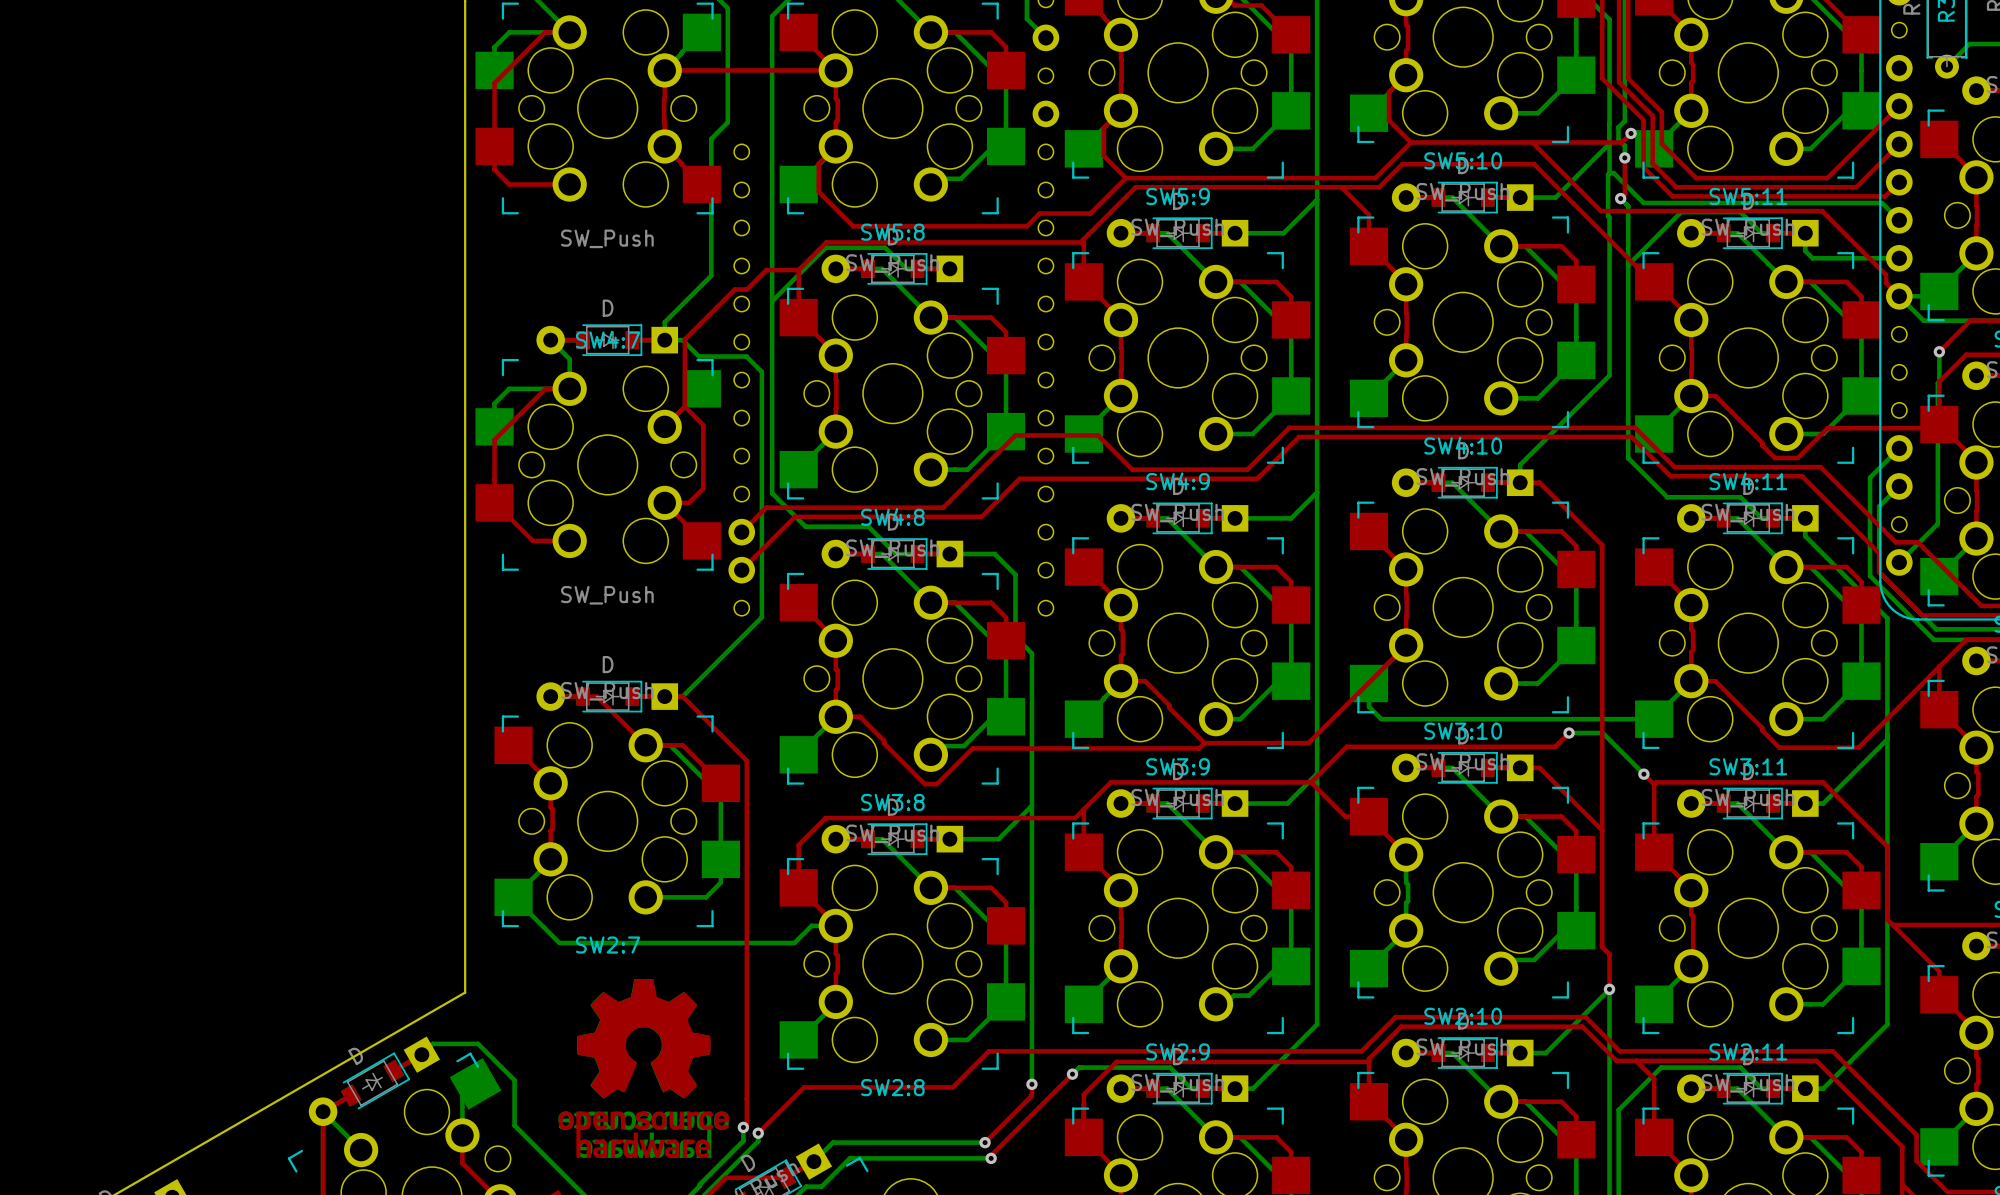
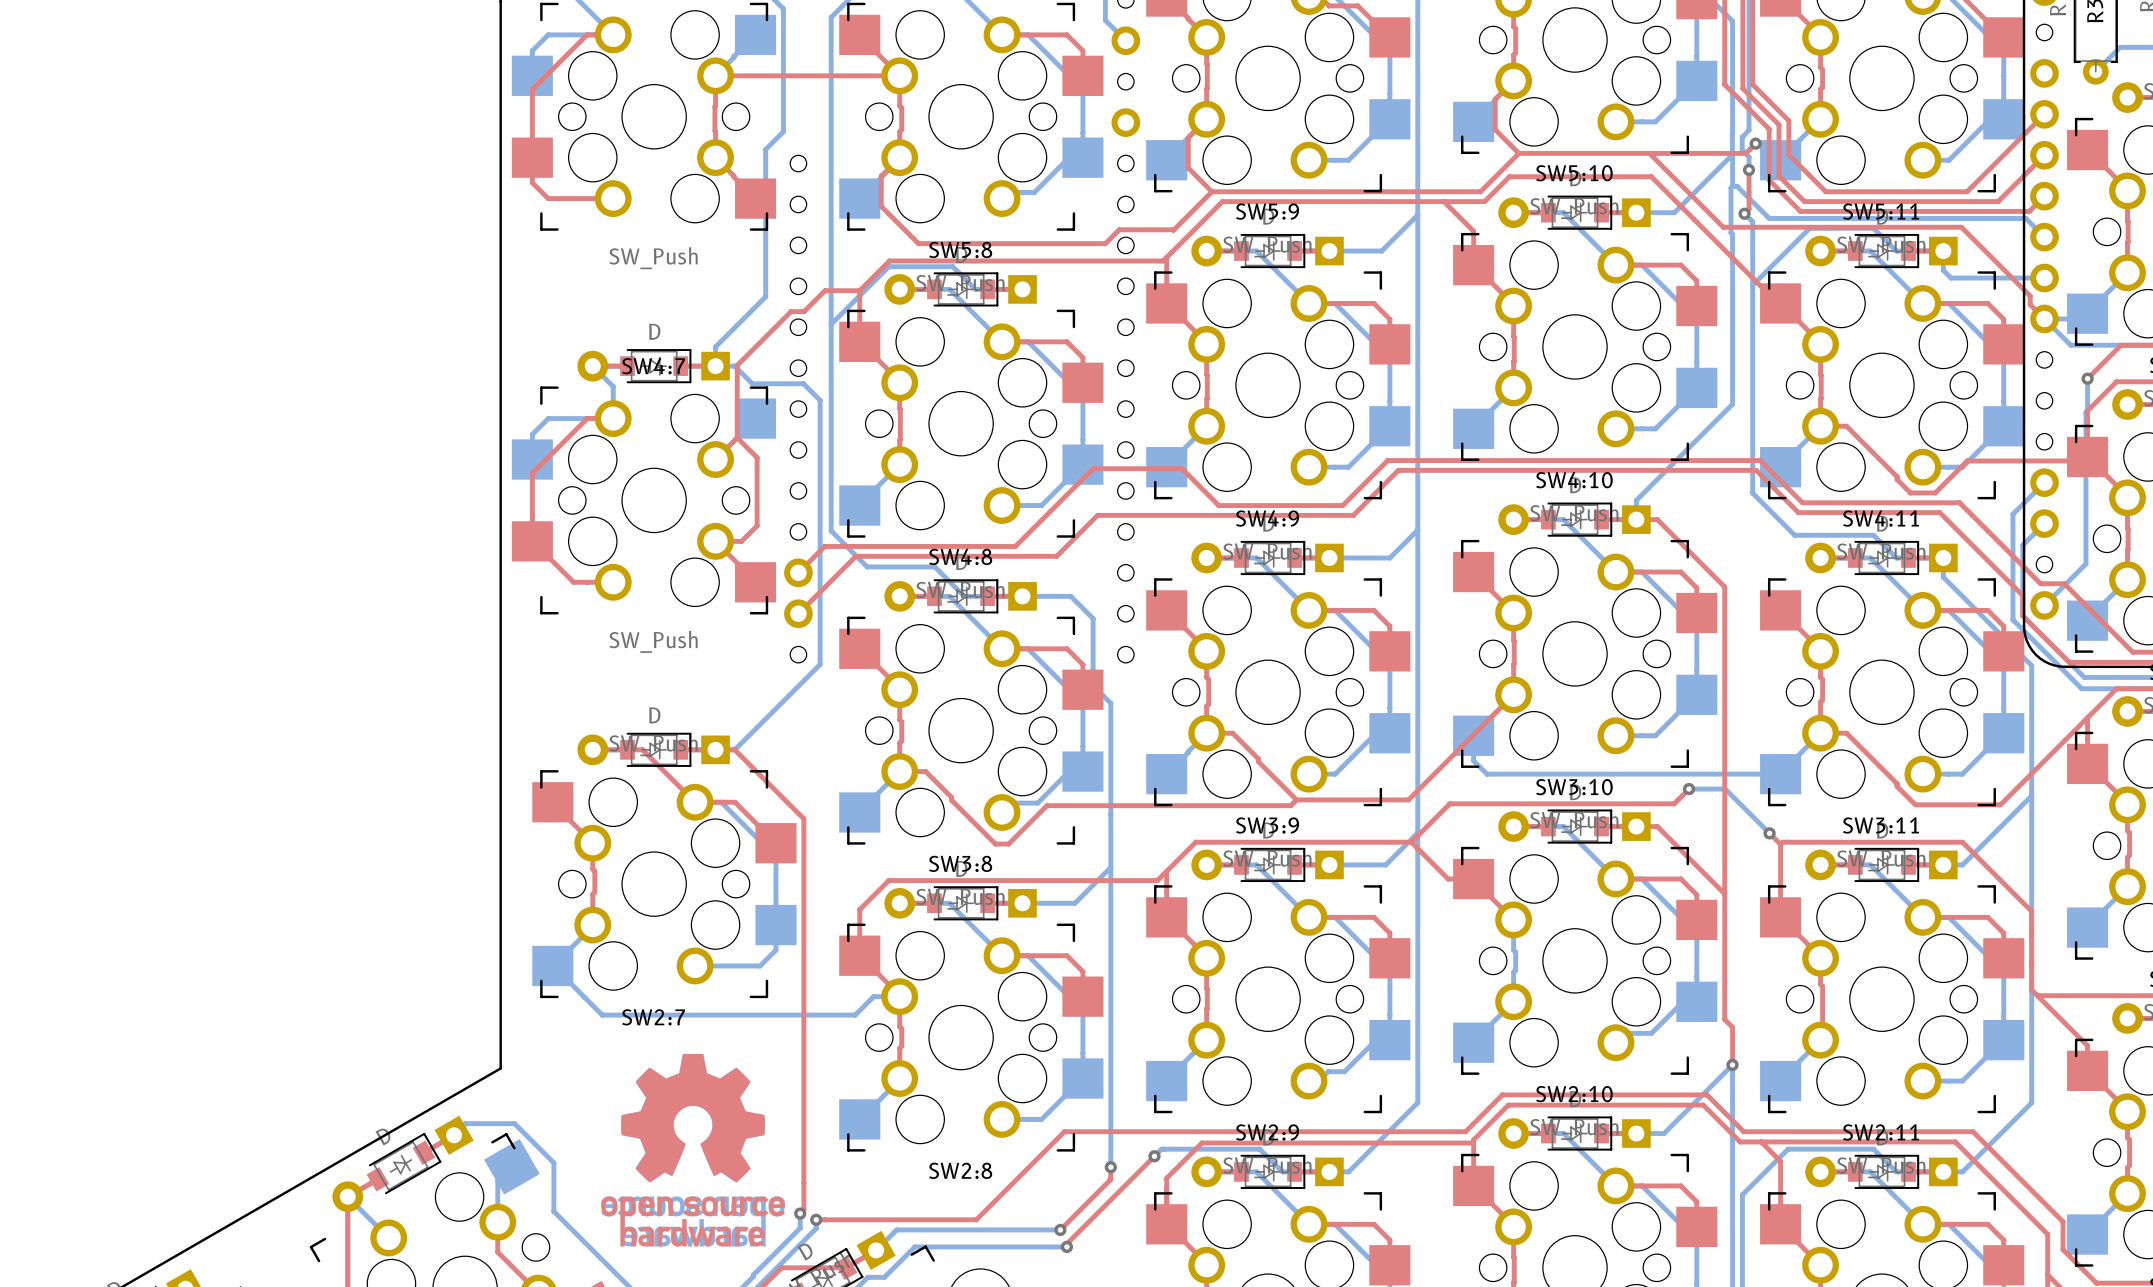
top track: (952, 1087) (803, 1087) (758, 1133) -> (1025, 1170) (976, 1219) (816, 1219)

